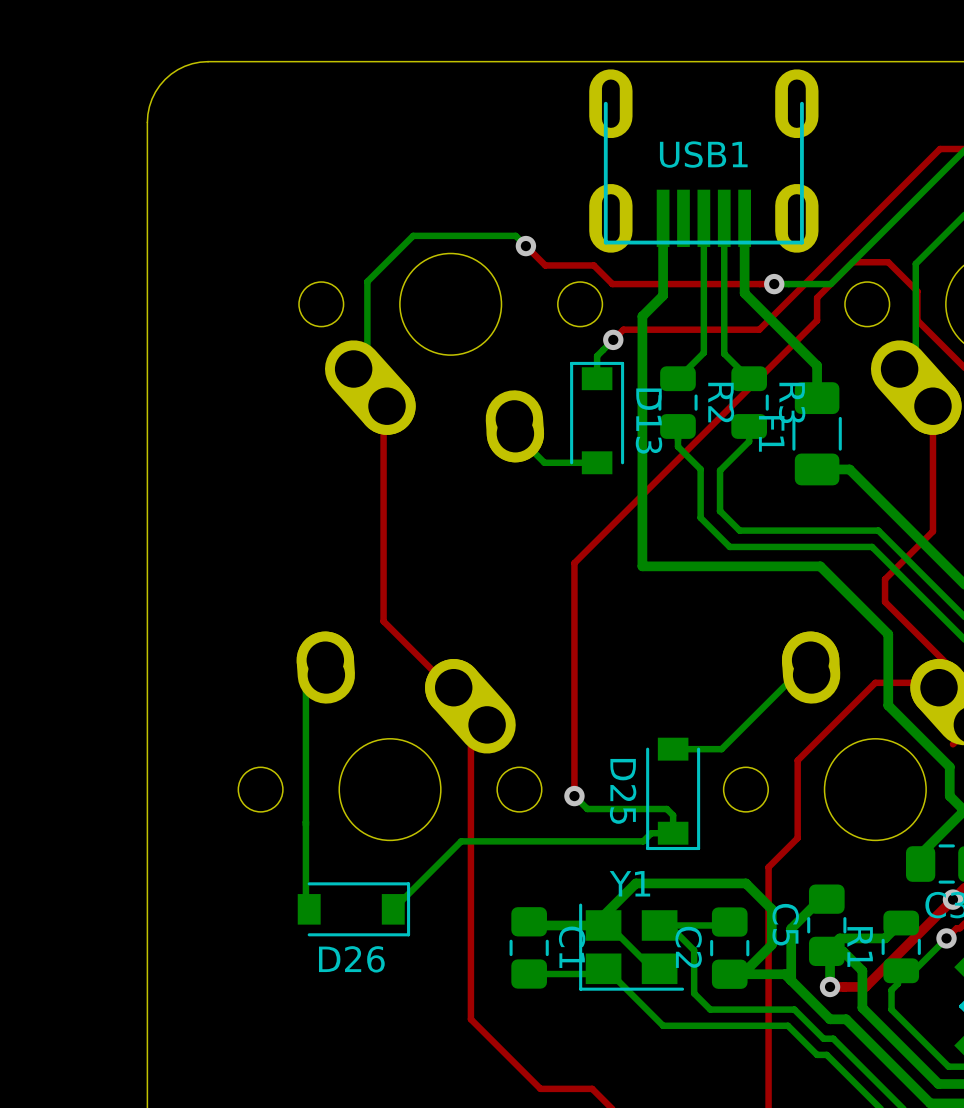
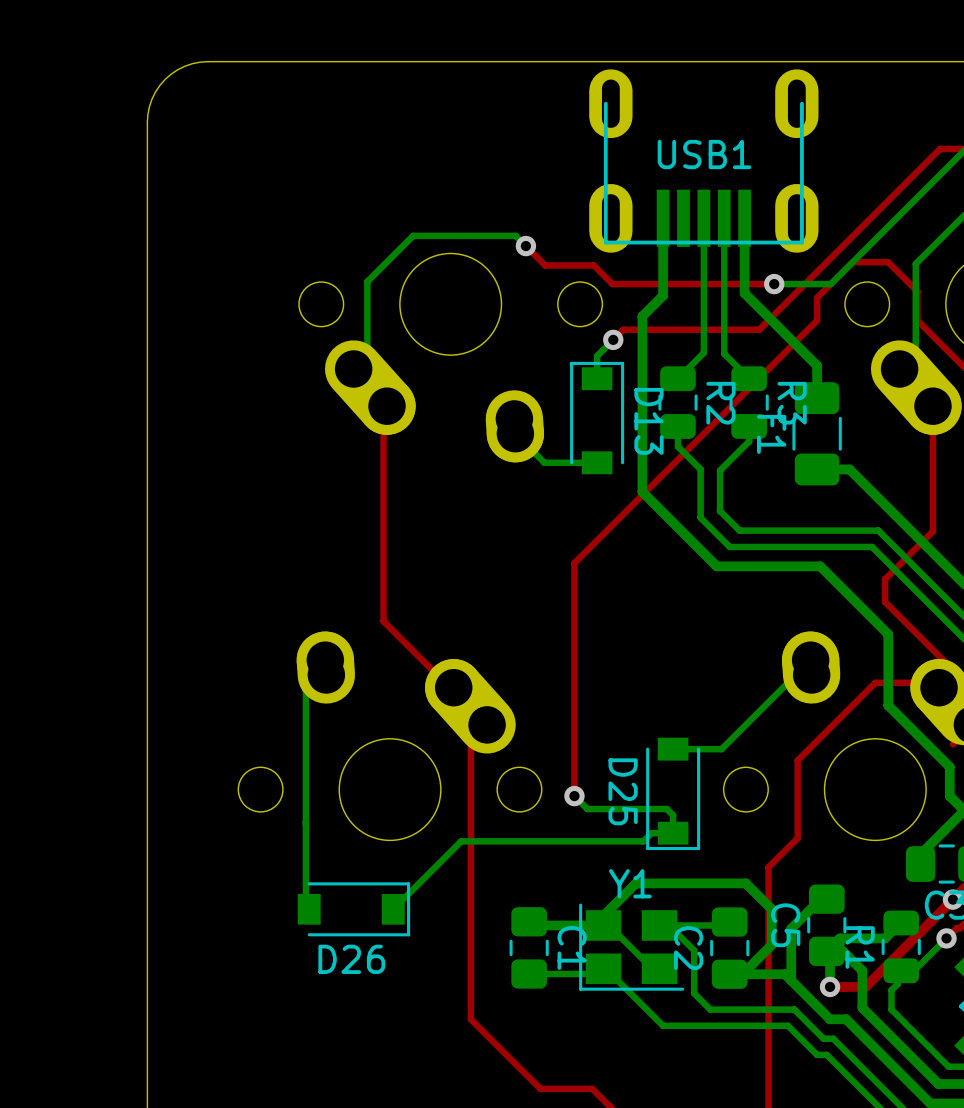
bottom track: (642, 491) (642, 566) (716, 566) -> (642, 491) (716, 566)

